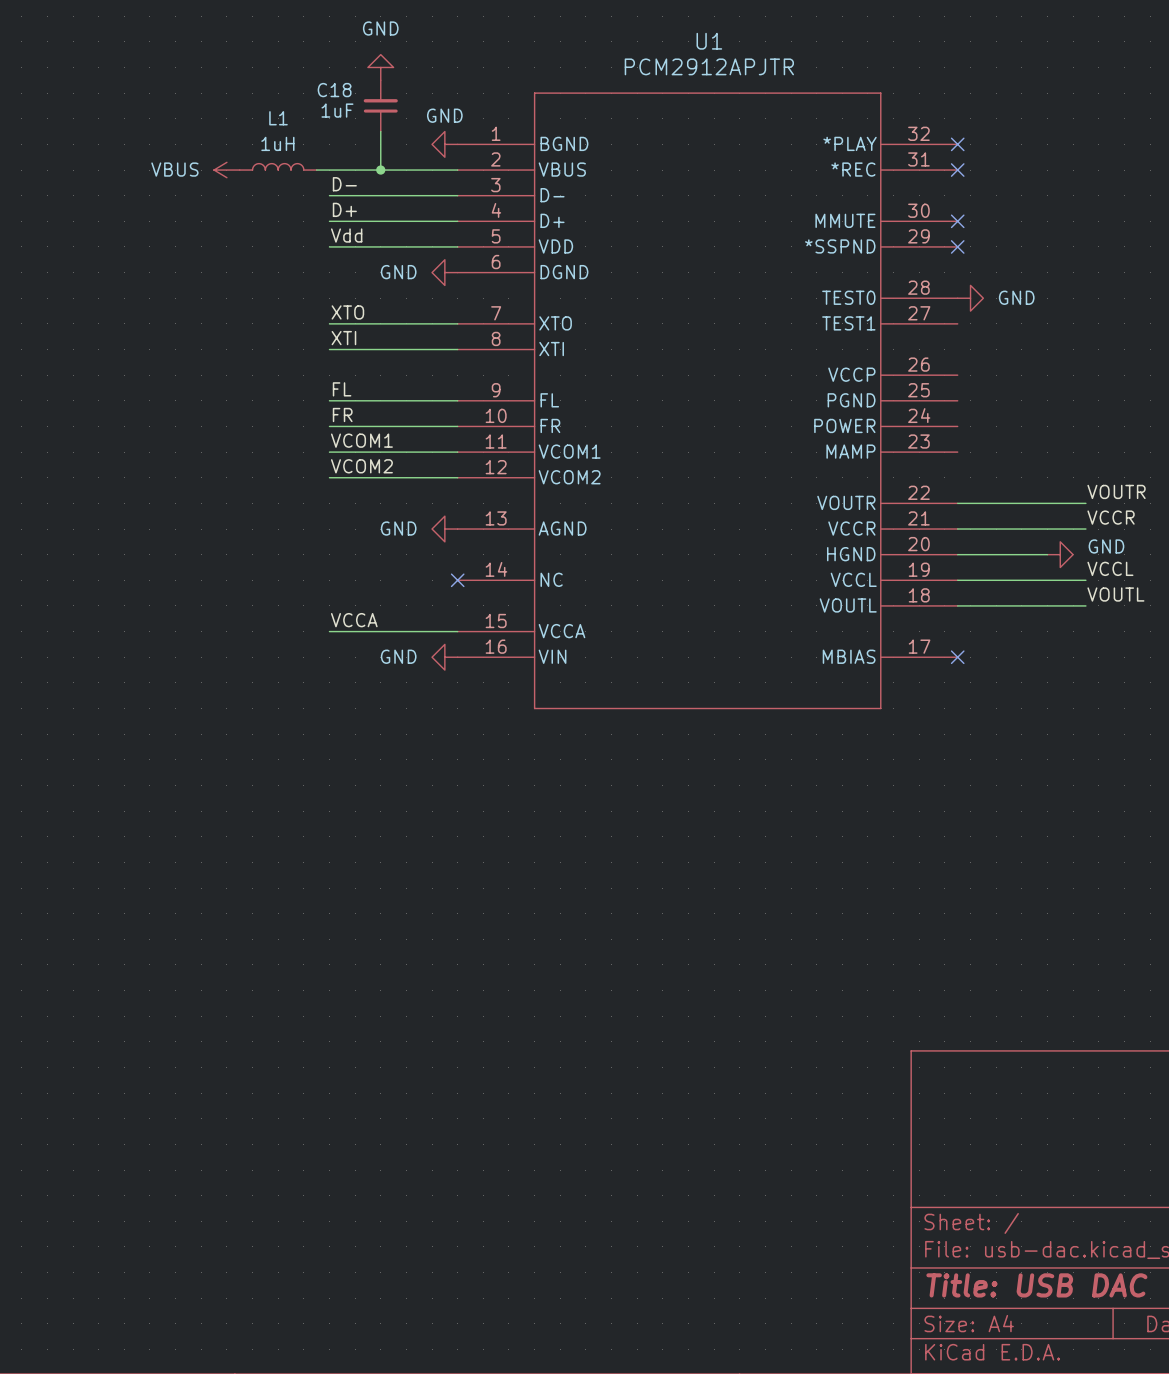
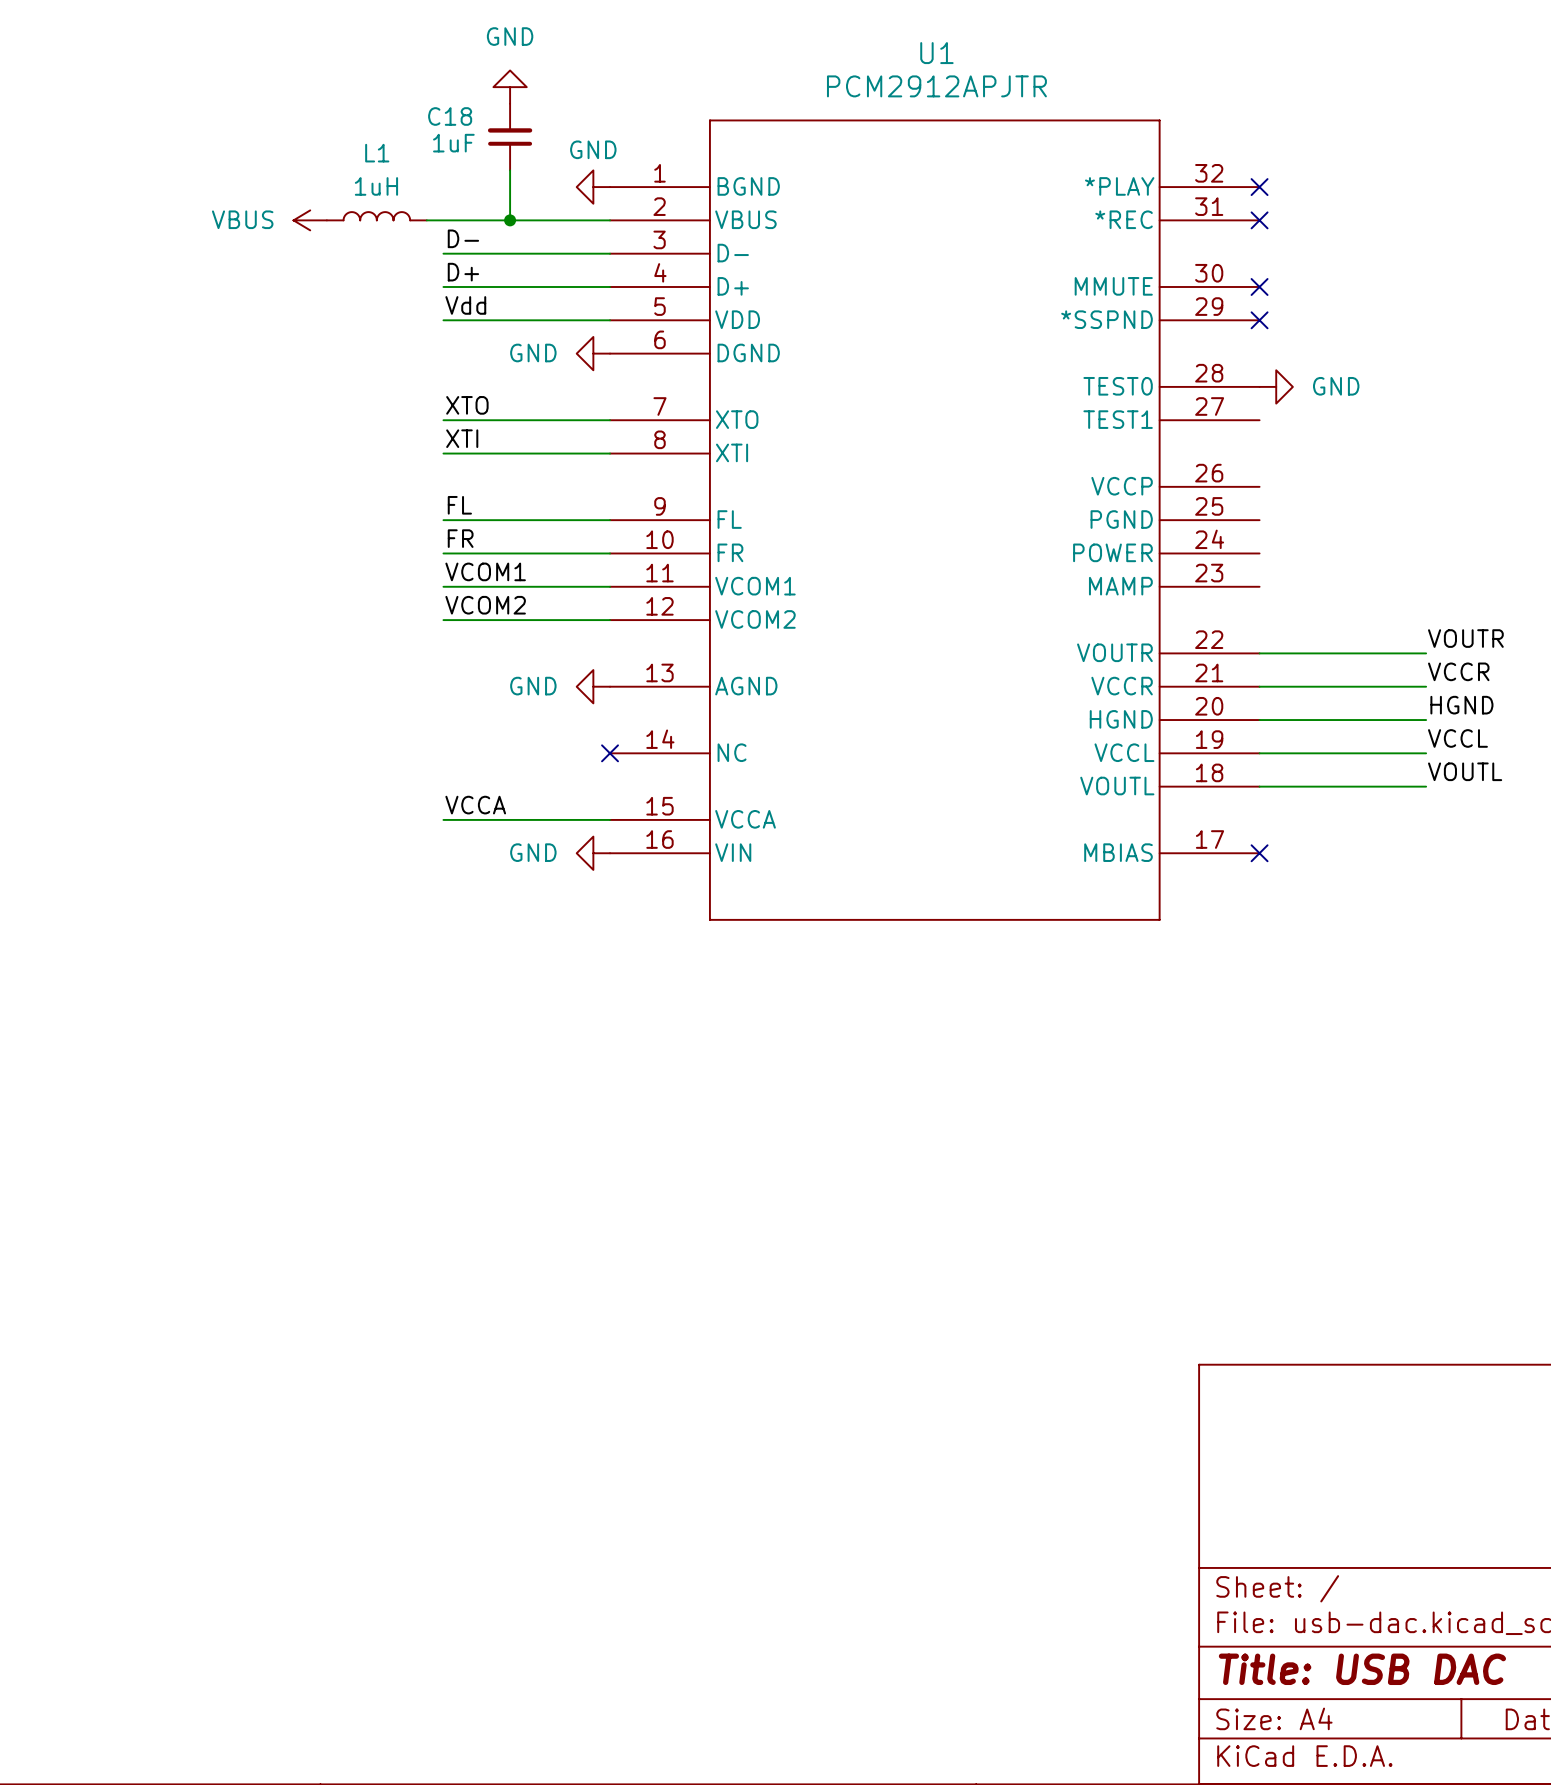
label: none -> HGND (1461, 705)
wire: none -> (1376, 720) (1426, 720)
power symbol: GND (1060, 554) -> none

